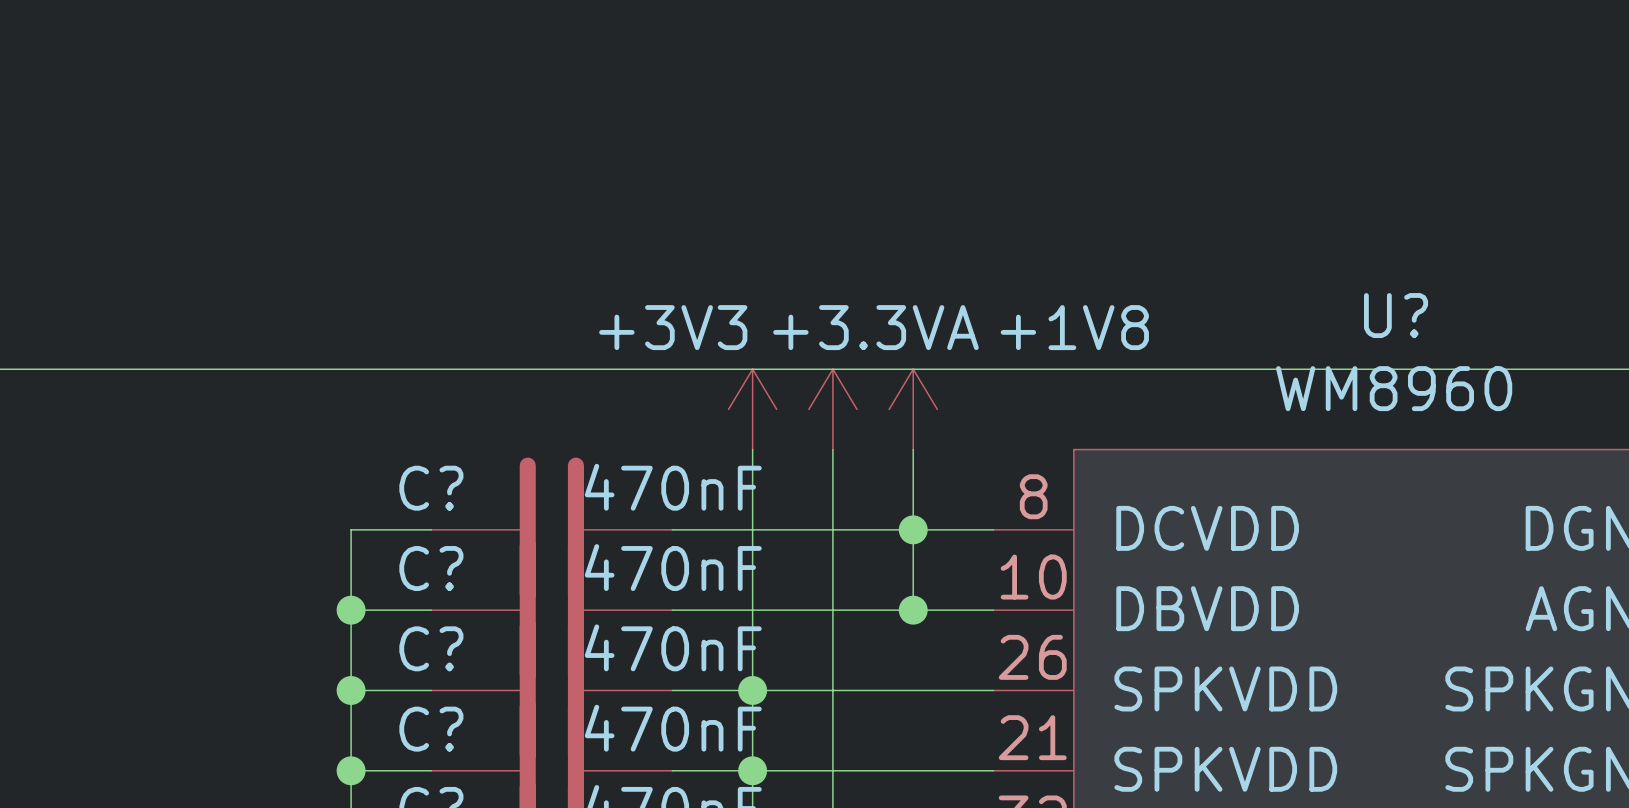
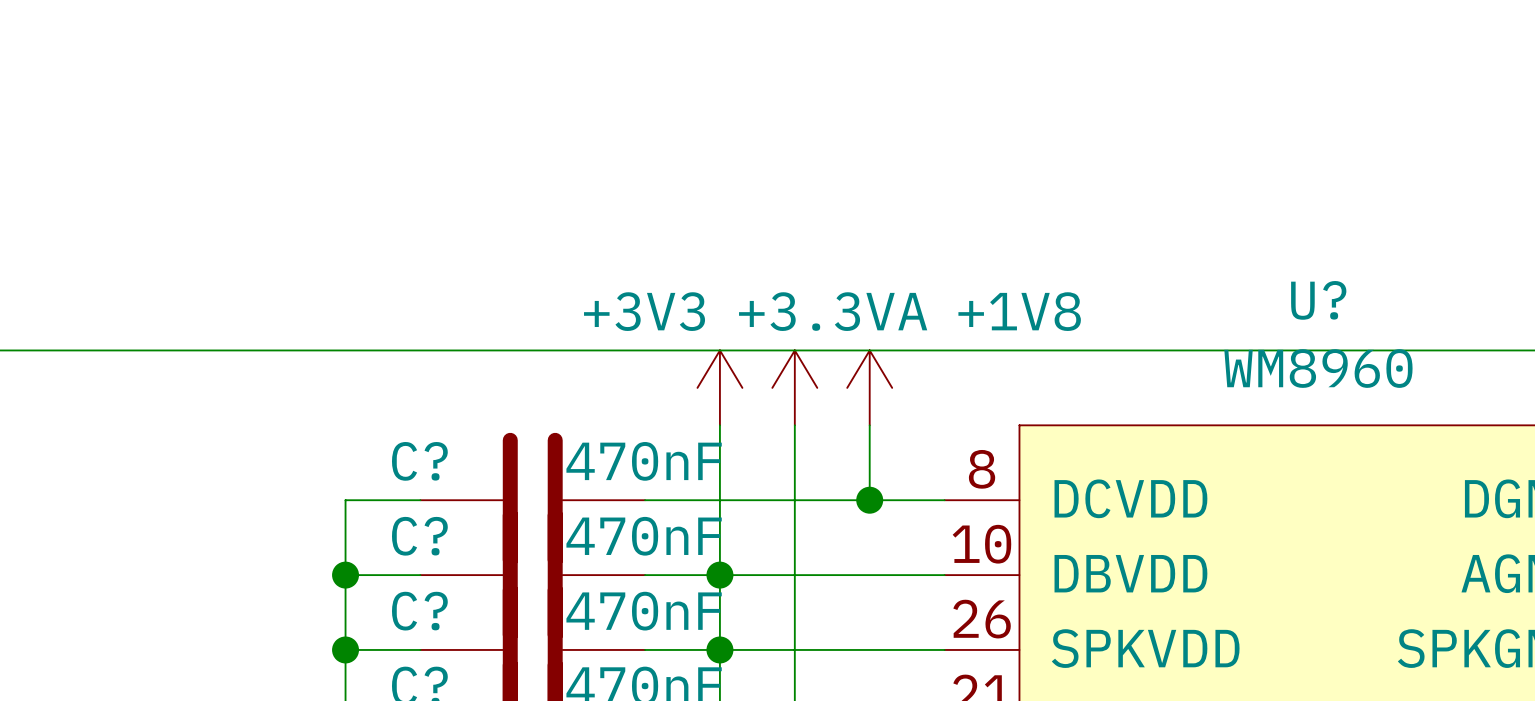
wire: (913, 529) (913, 610) -> none
junction position: (913, 610) -> (719, 575)

